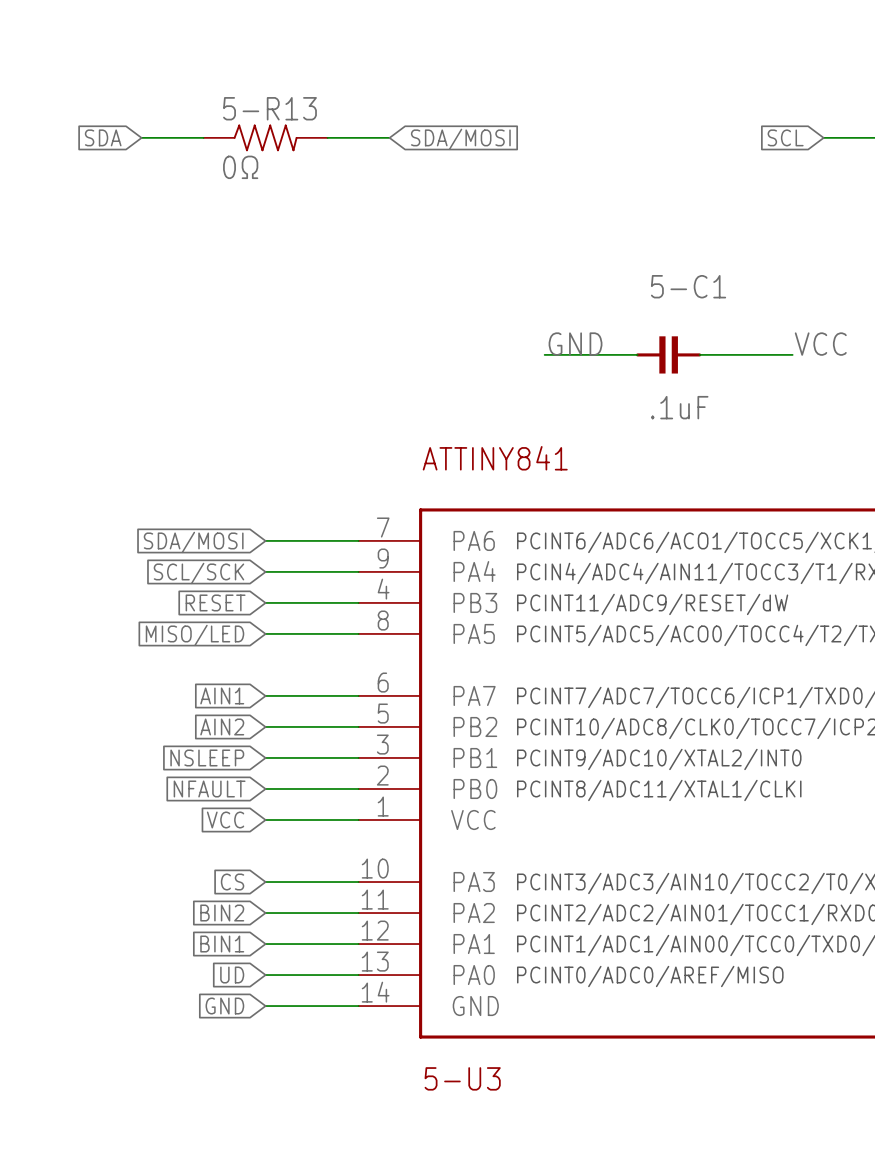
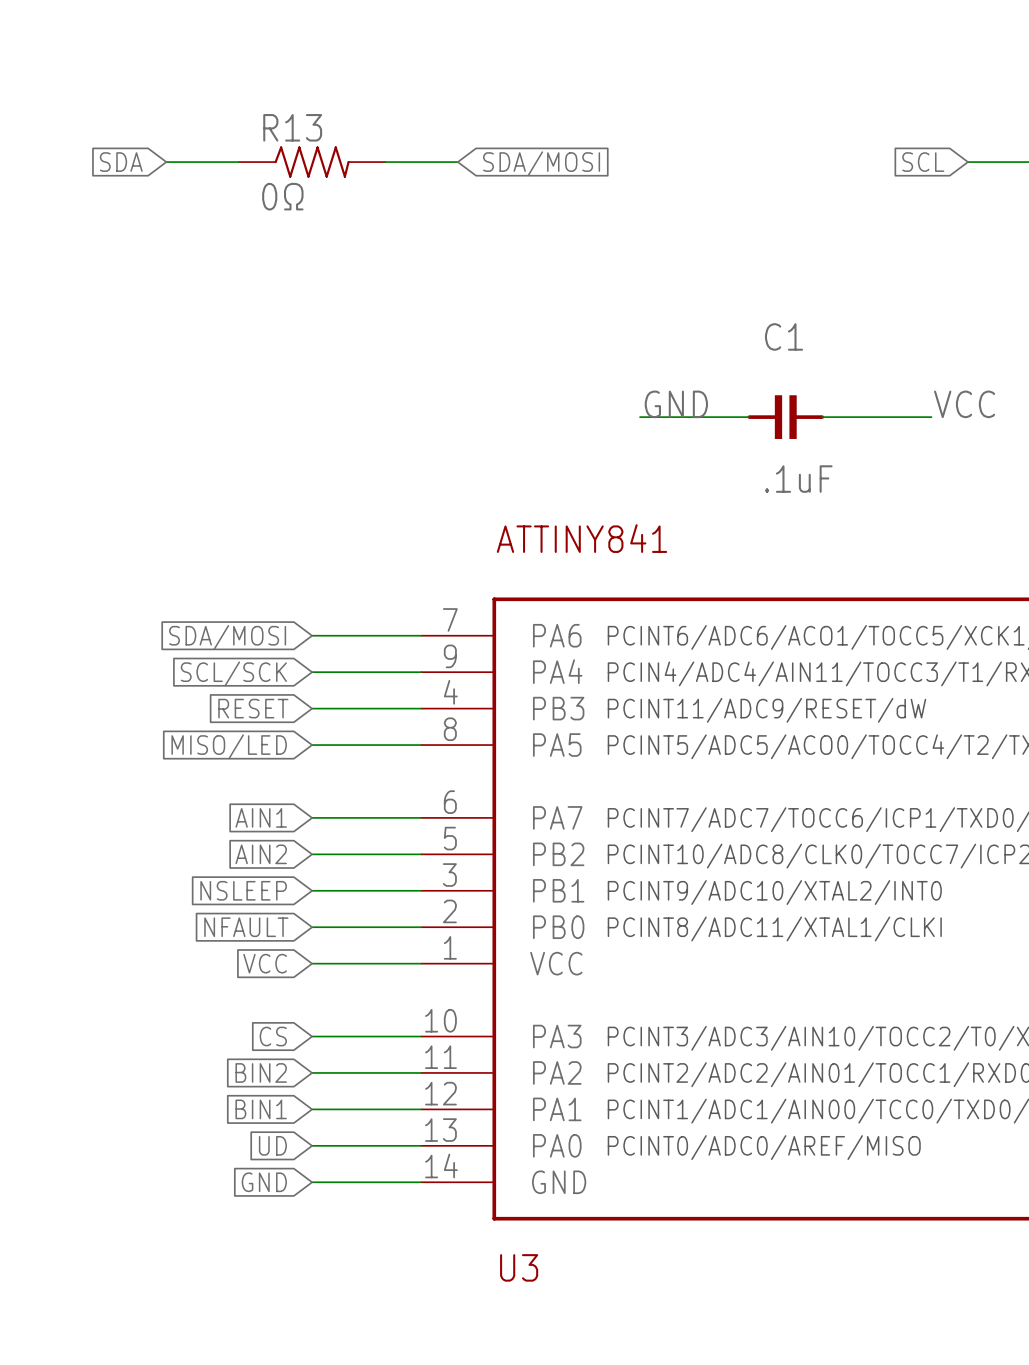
5-R13 name: 5-R13 (269, 108) -> R13 (292, 127)
5-C1 name: 5-C1 (688, 286) -> C1 (784, 336)
5-U3 name: 5-U3 (462, 1078) -> U3 (519, 1267)

